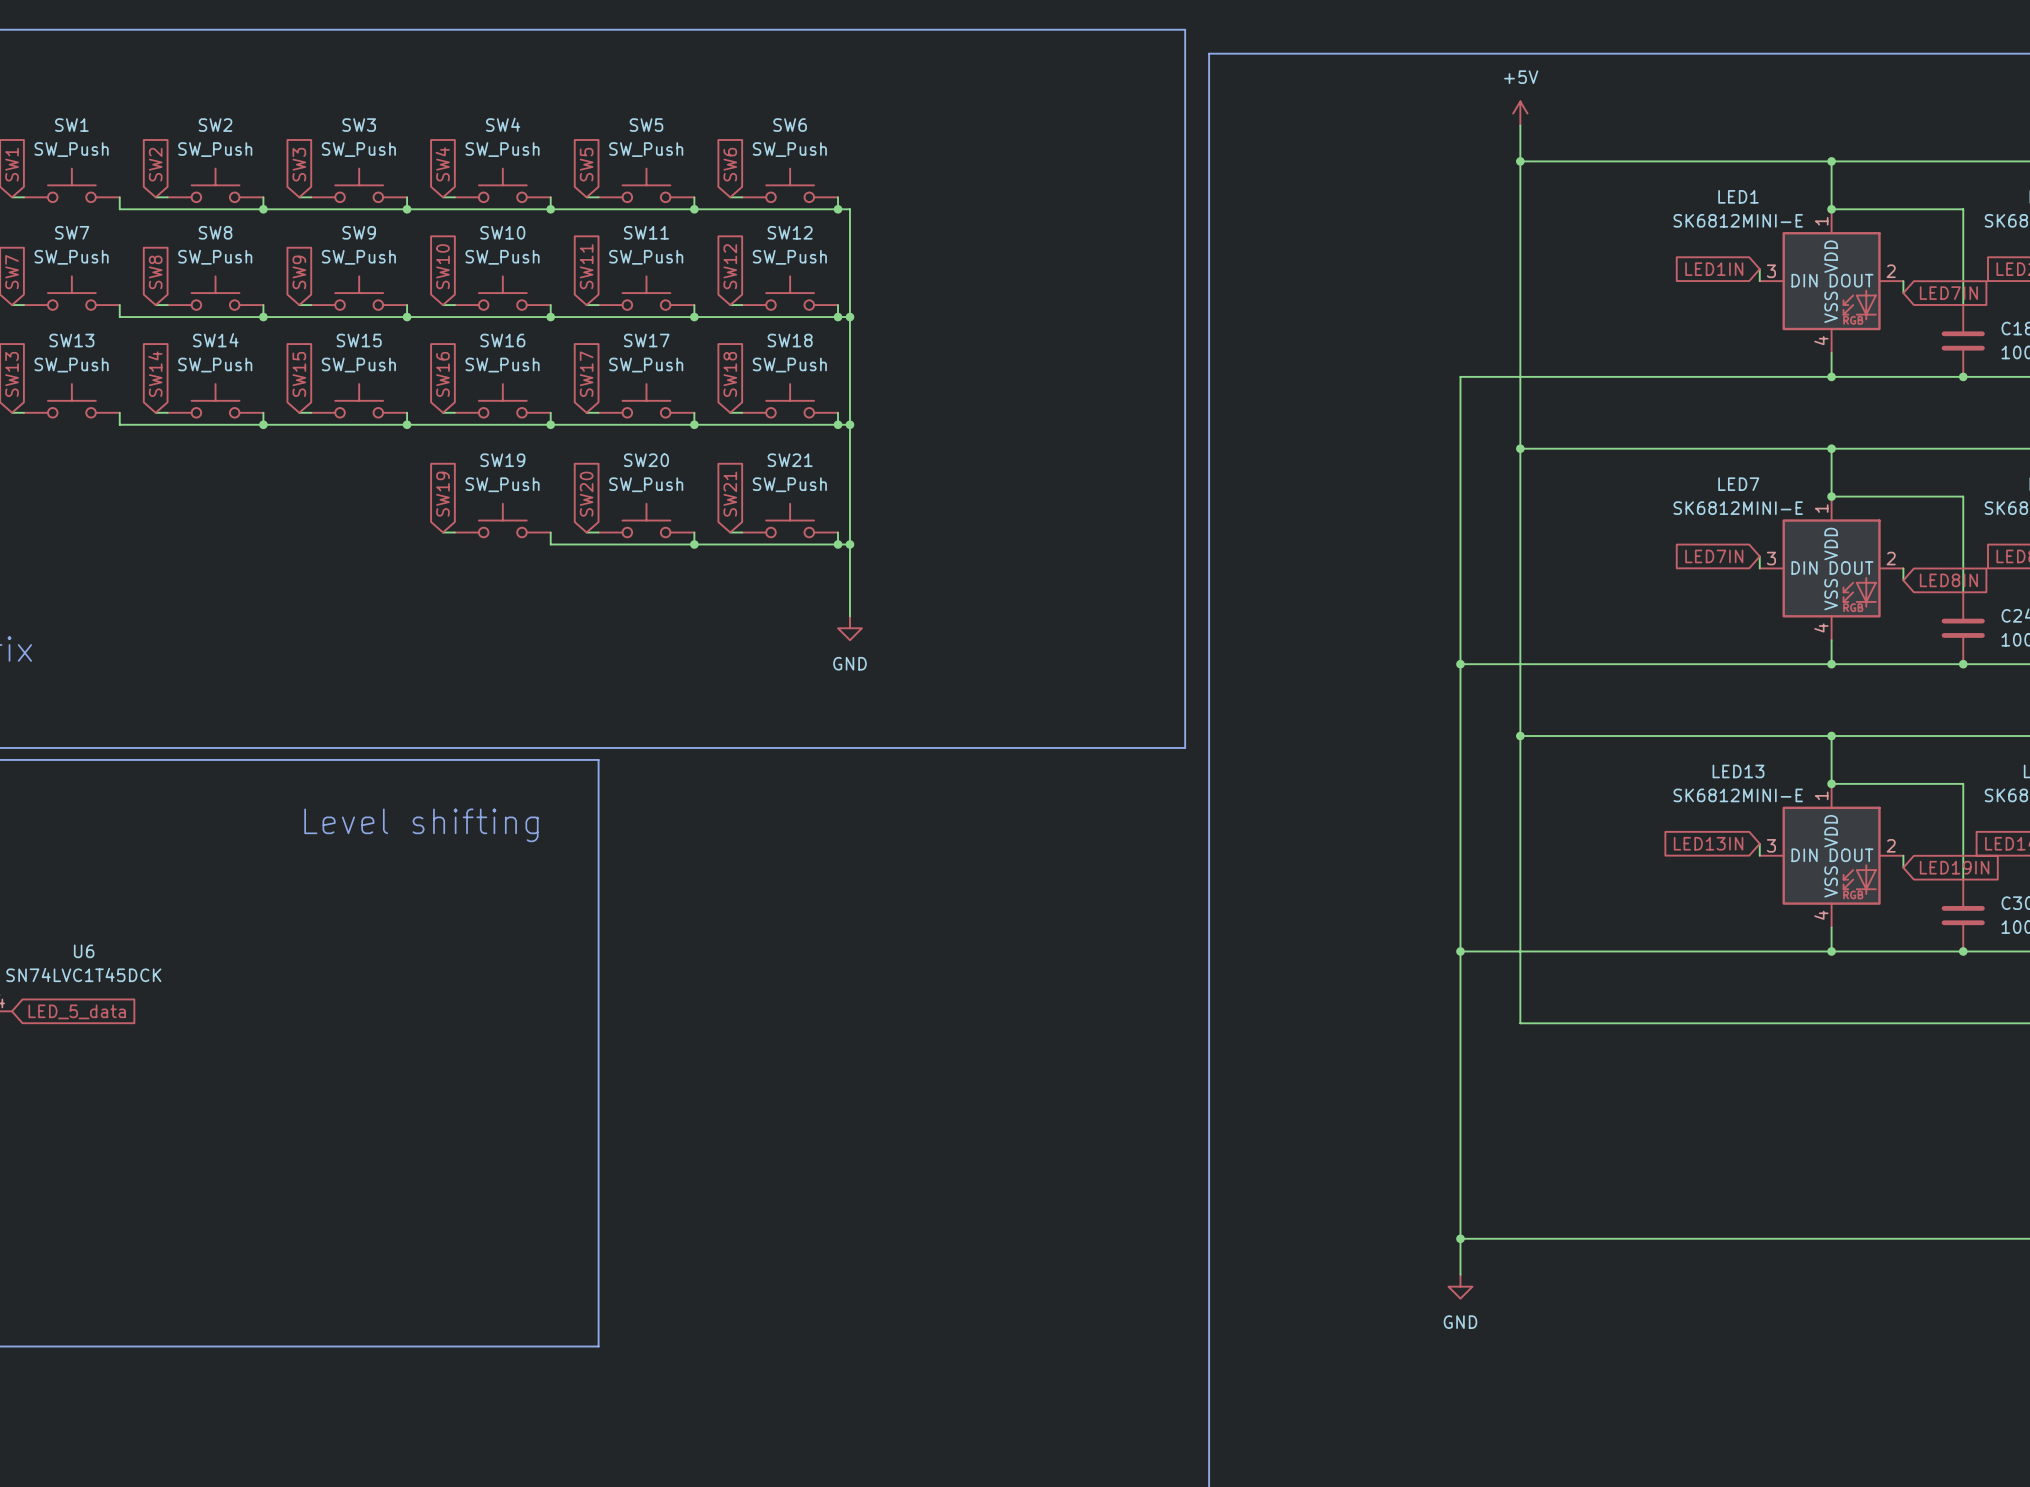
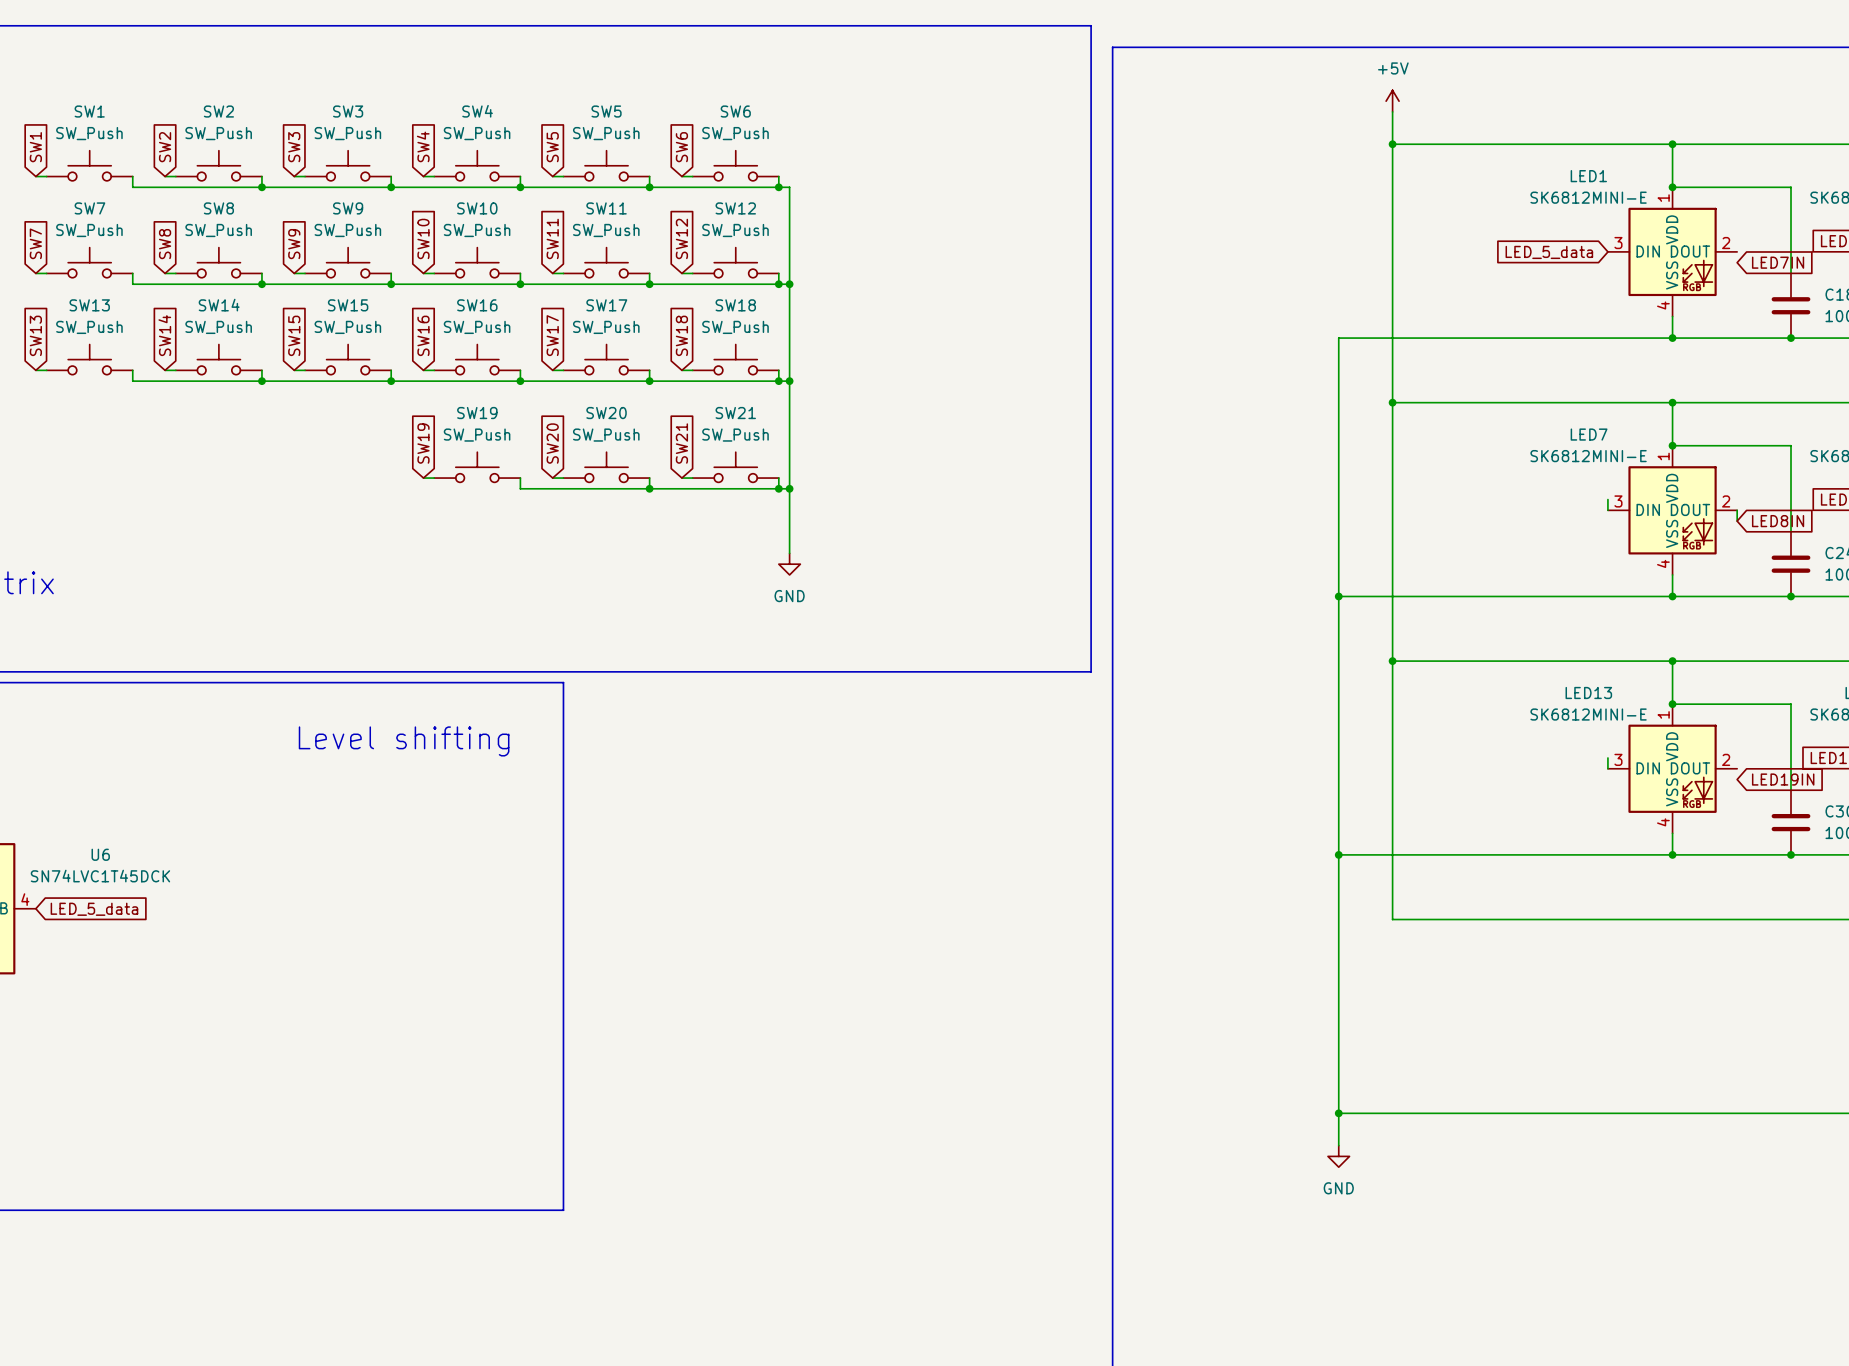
global label: LED1IN (1714, 269) -> none
wire: (1759, 269) (1759, 281) -> none
global label: none -> LED_5_data (1549, 252)
wire: (1903, 281) (1903, 293) -> none
global label: LED7IN (1714, 556) -> none
global label: LED13IN (1708, 843) -> none
wire: (1903, 855) (1903, 867) -> none

